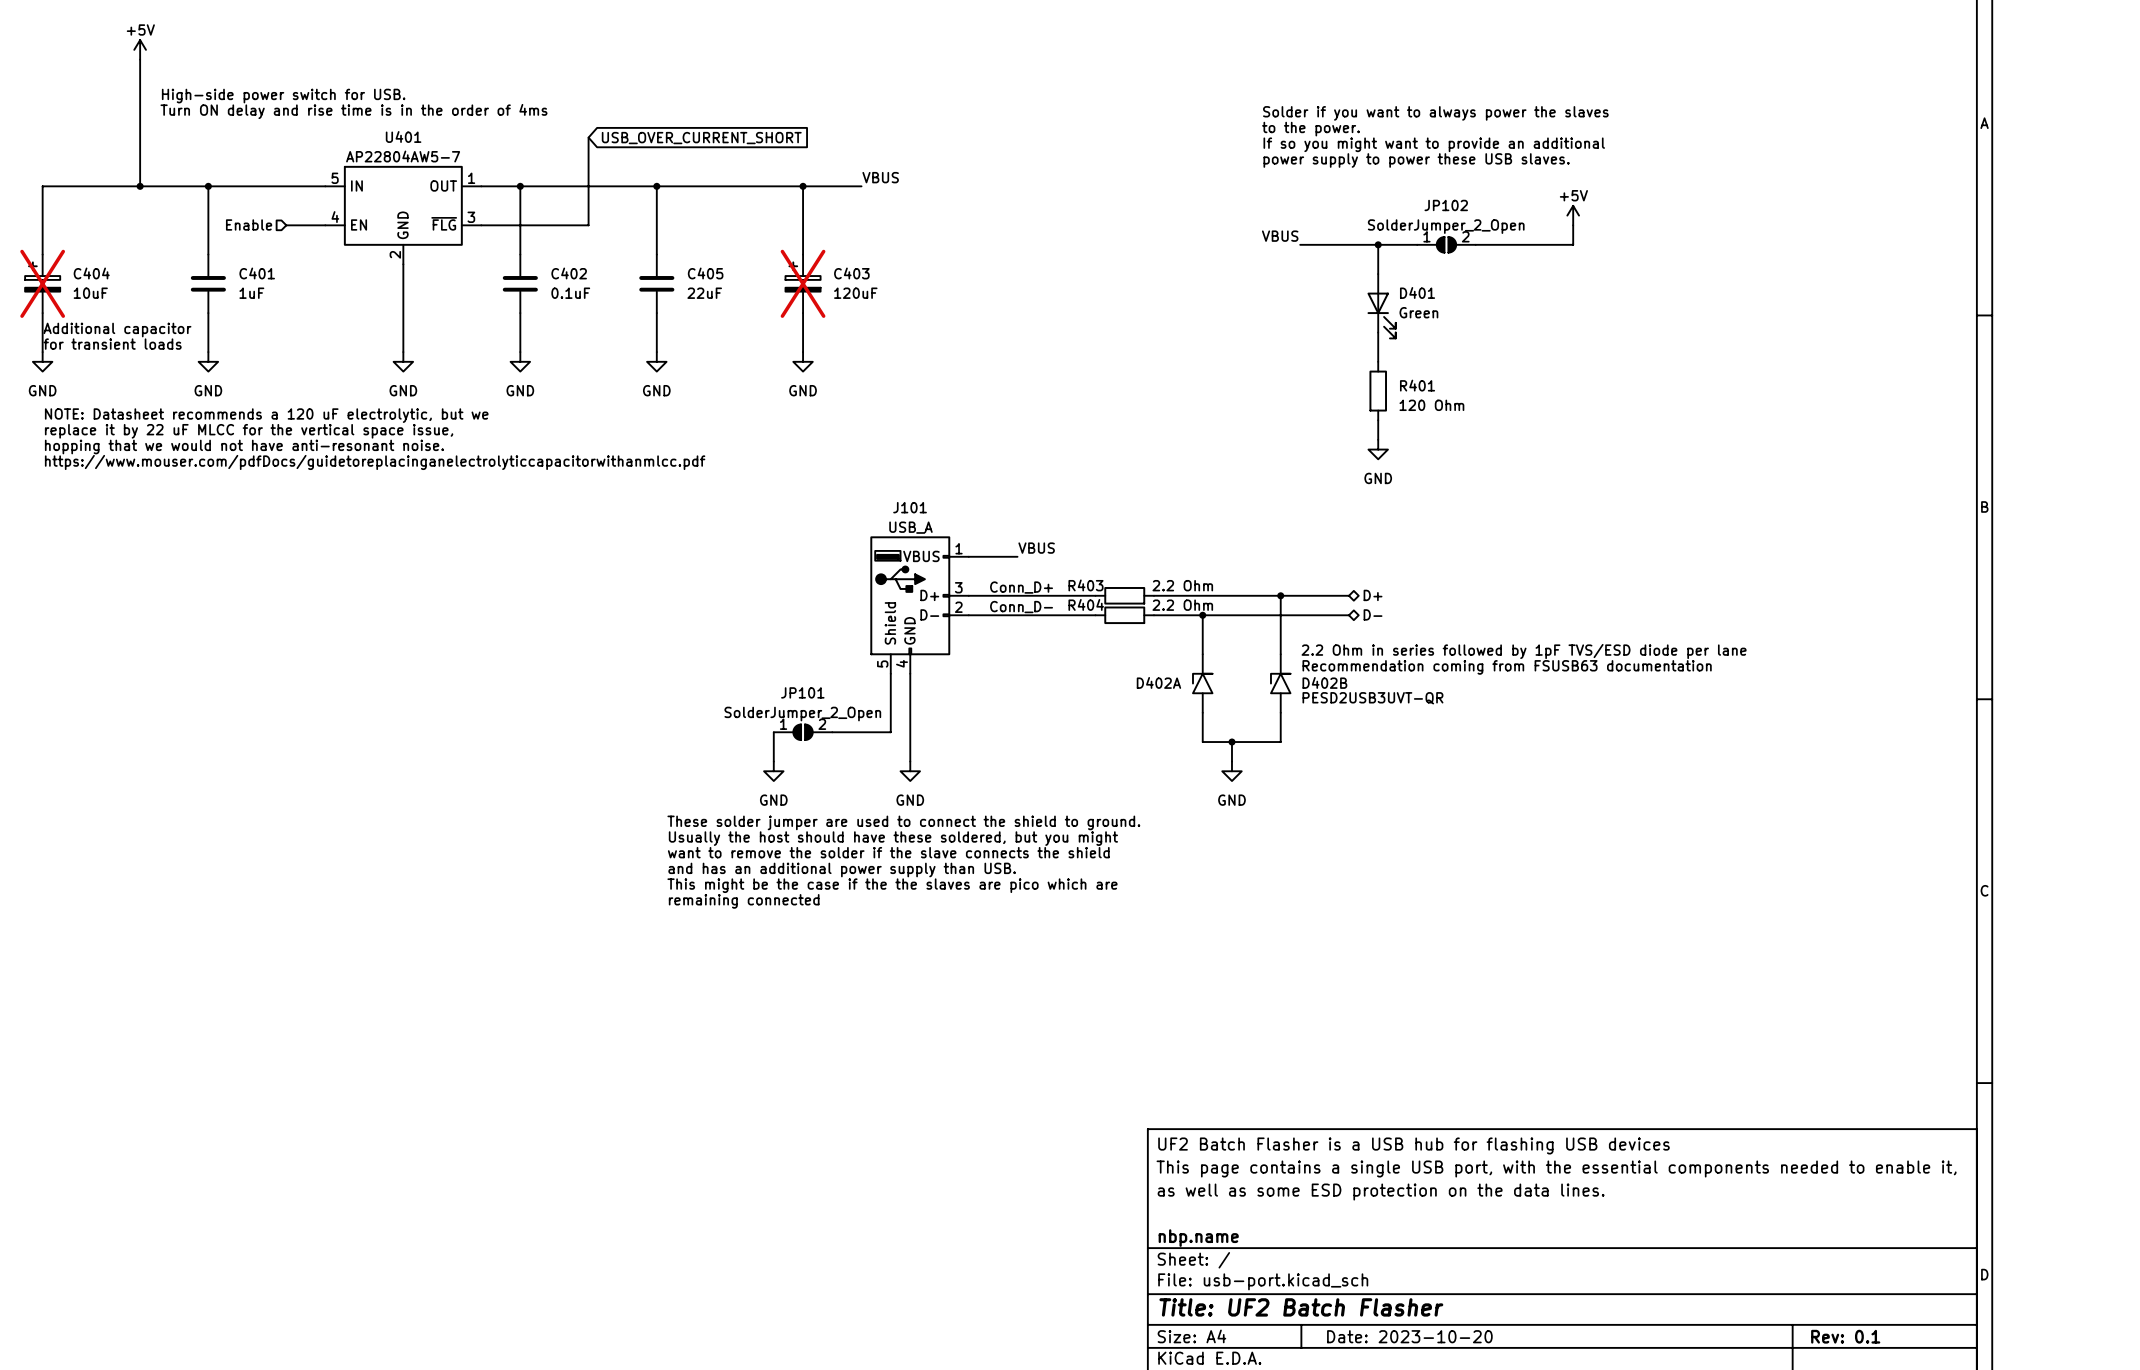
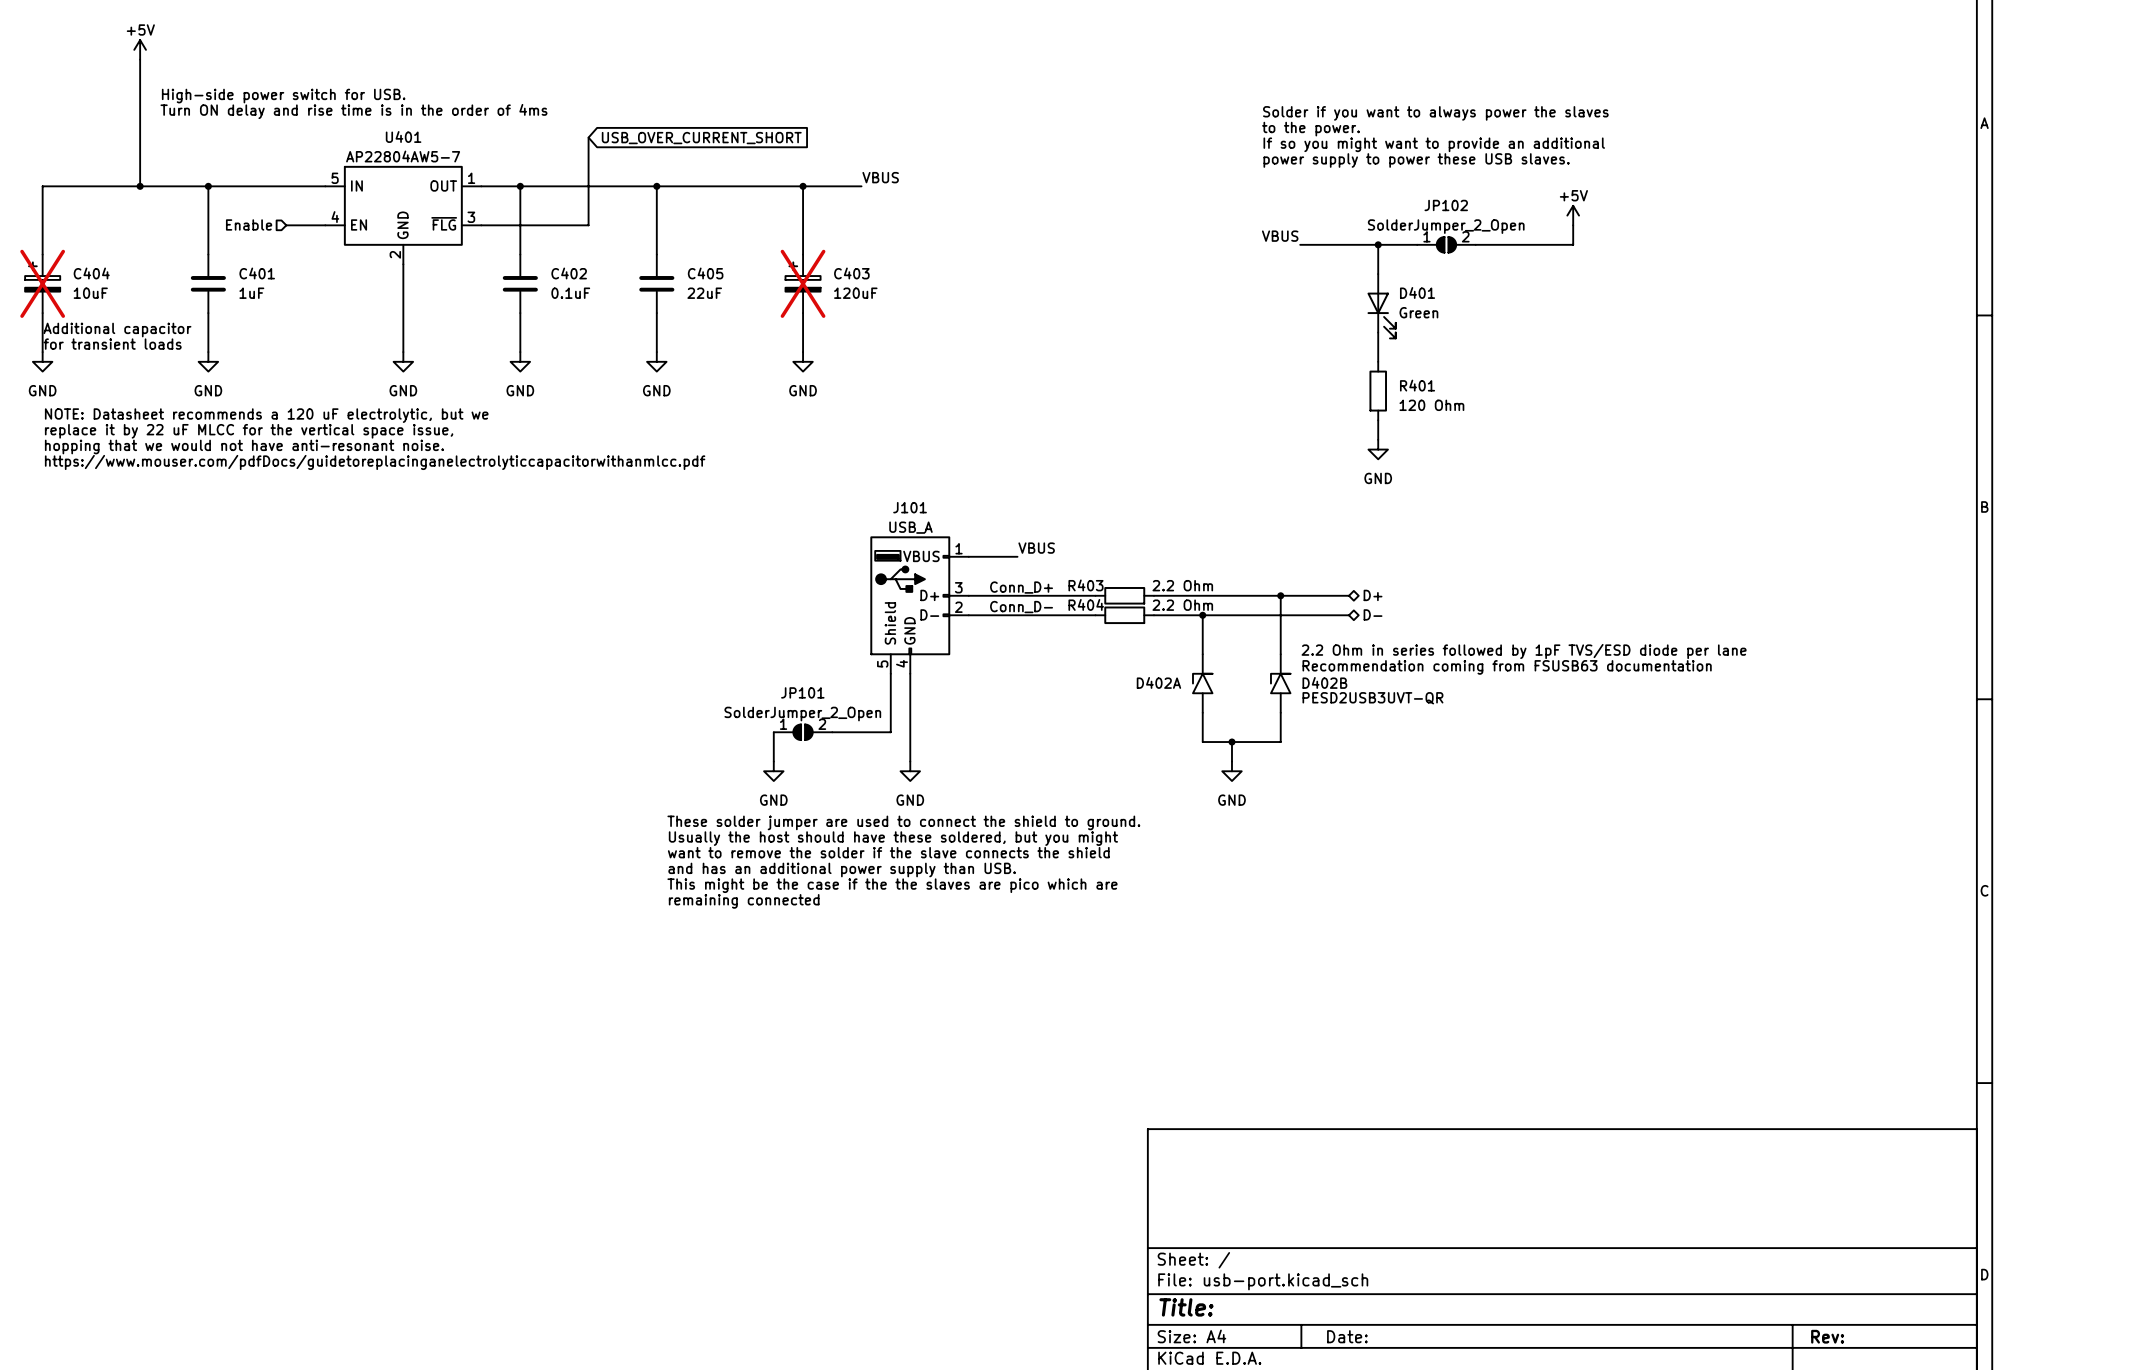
title block: UF2 Batch Flasher is a USB hub for flashing USB devices (1414, 1145) -> none
title block: This page contains a single USB port, with the essential components needed to enable it, (1556, 1168) -> none
title block: as well as some ESD protection on the data lines. (1381, 1192) -> none
title block: nbp.name (1198, 1238) -> none
title block: Title: UF2 Batch Flasher (1301, 1307) -> Title: (1186, 1307)
title block: Date: 2023-10-20 (1409, 1336) -> Date: (1347, 1336)
title block: Rev: 0.1 (1845, 1336) -> Rev: (1827, 1336)

